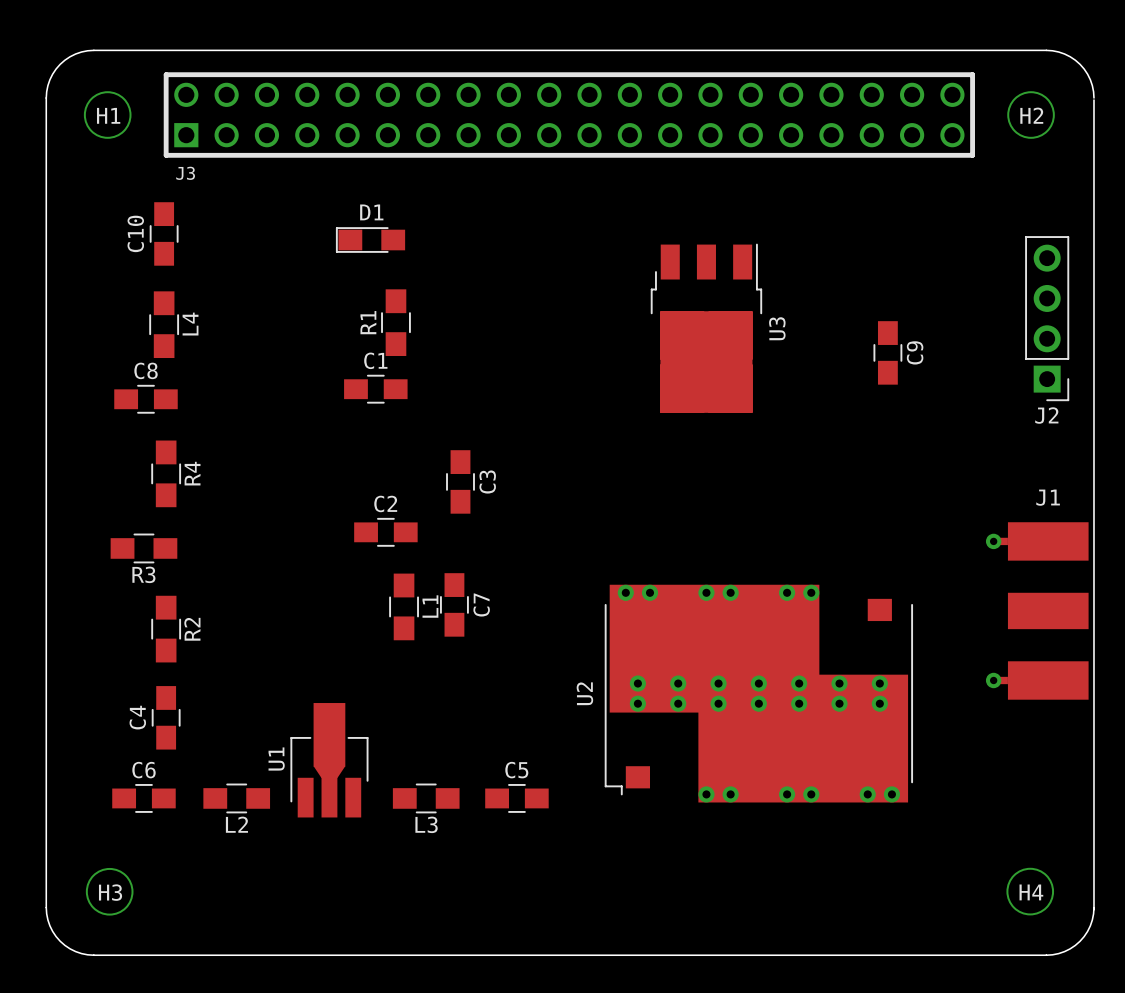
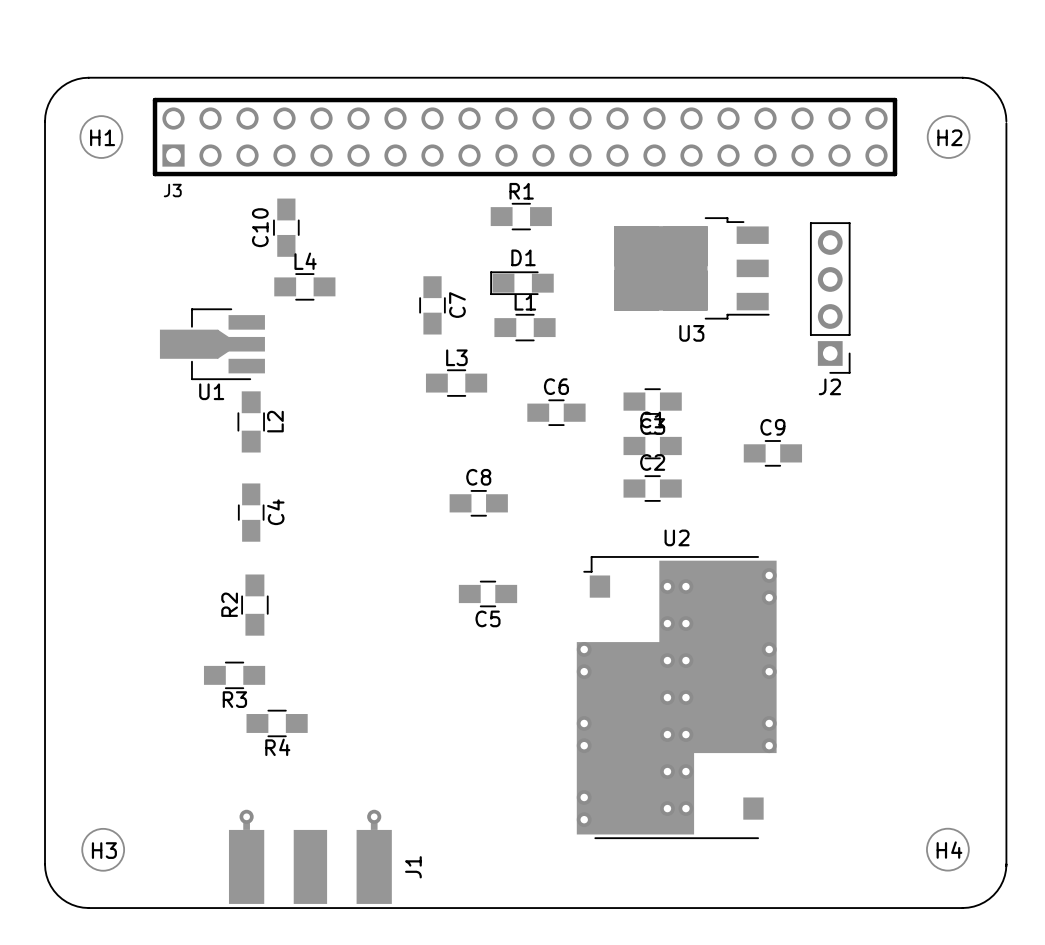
C10 position: (164, 233) -> (286, 227)
D1 position: (370, 240) -> (521, 283)
J2 position: (1047, 318) -> (830, 297)
R1 rotation: 0° (395, 322) -> 90° clockwise (521, 216)
R1 position: (395, 322) -> (521, 216)
L4 rotation: 0° (164, 324) -> 90° clockwise (304, 286)
L4 position: (164, 324) -> (304, 286)
L4 name position: L4 (190, 324) -> L4 (305, 261)
U3 rotation: 0° (706, 328) -> 90° clockwise (691, 268)
C9 rotation: 0° (887, 352) -> 90° clockwise (772, 453)
C9 position: (887, 352) -> (772, 453)
C9 name position: C9 (915, 352) -> C9 (772, 427)
C1 position: (375, 389) -> (652, 445)
C8 position: (145, 399) -> (478, 503)
R4 rotation: 0° (166, 473) -> 90° clockwise (277, 723)
R4 position: (166, 473) -> (277, 723)
C3 rotation: 0° (460, 481) -> 90° clockwise (652, 401)
C3 position: (460, 481) -> (652, 401)
C2 position: (385, 532) -> (652, 488)
R3 position: (143, 548) -> (234, 675)
C7 position: (454, 604) -> (432, 305)
L1 rotation: 0° (404, 606) -> 90° clockwise (525, 327)
L1 position: (404, 606) -> (525, 327)
L1 name position: L1 (430, 606) -> L1 (525, 302)
J1 rotation: 0° (1037, 610) -> 90° clockwise (310, 856)
J1 position: (1037, 610) -> (310, 856)
R2 position: (166, 629) -> (254, 605)
R2 name position: R2 (192, 629) -> R2 (229, 604)
U2 rotation: 0° (758, 693) -> 90° clockwise (676, 697)
C4 name position: C4 (137, 717) -> C4 (275, 512)
C4 position: (166, 717) -> (251, 512)
U1 rotation: 0° (329, 760) -> 90° counterclockwise (212, 344)
U1 position: (329, 760) -> (212, 344)
C5 name position: C5 (516, 770) -> C5 (488, 618)
C6 position: (143, 798) -> (556, 412)
L2 rotation: 0° (236, 798) -> 90° clockwise (251, 421)
L2 position: (236, 798) -> (251, 421)
L3 position: (426, 798) -> (456, 383)
C5 position: (516, 798) -> (488, 593)
L2 name position: L2 (236, 824) -> L2 (275, 421)
L3 name position: L3 (426, 824) -> L3 (456, 357)

